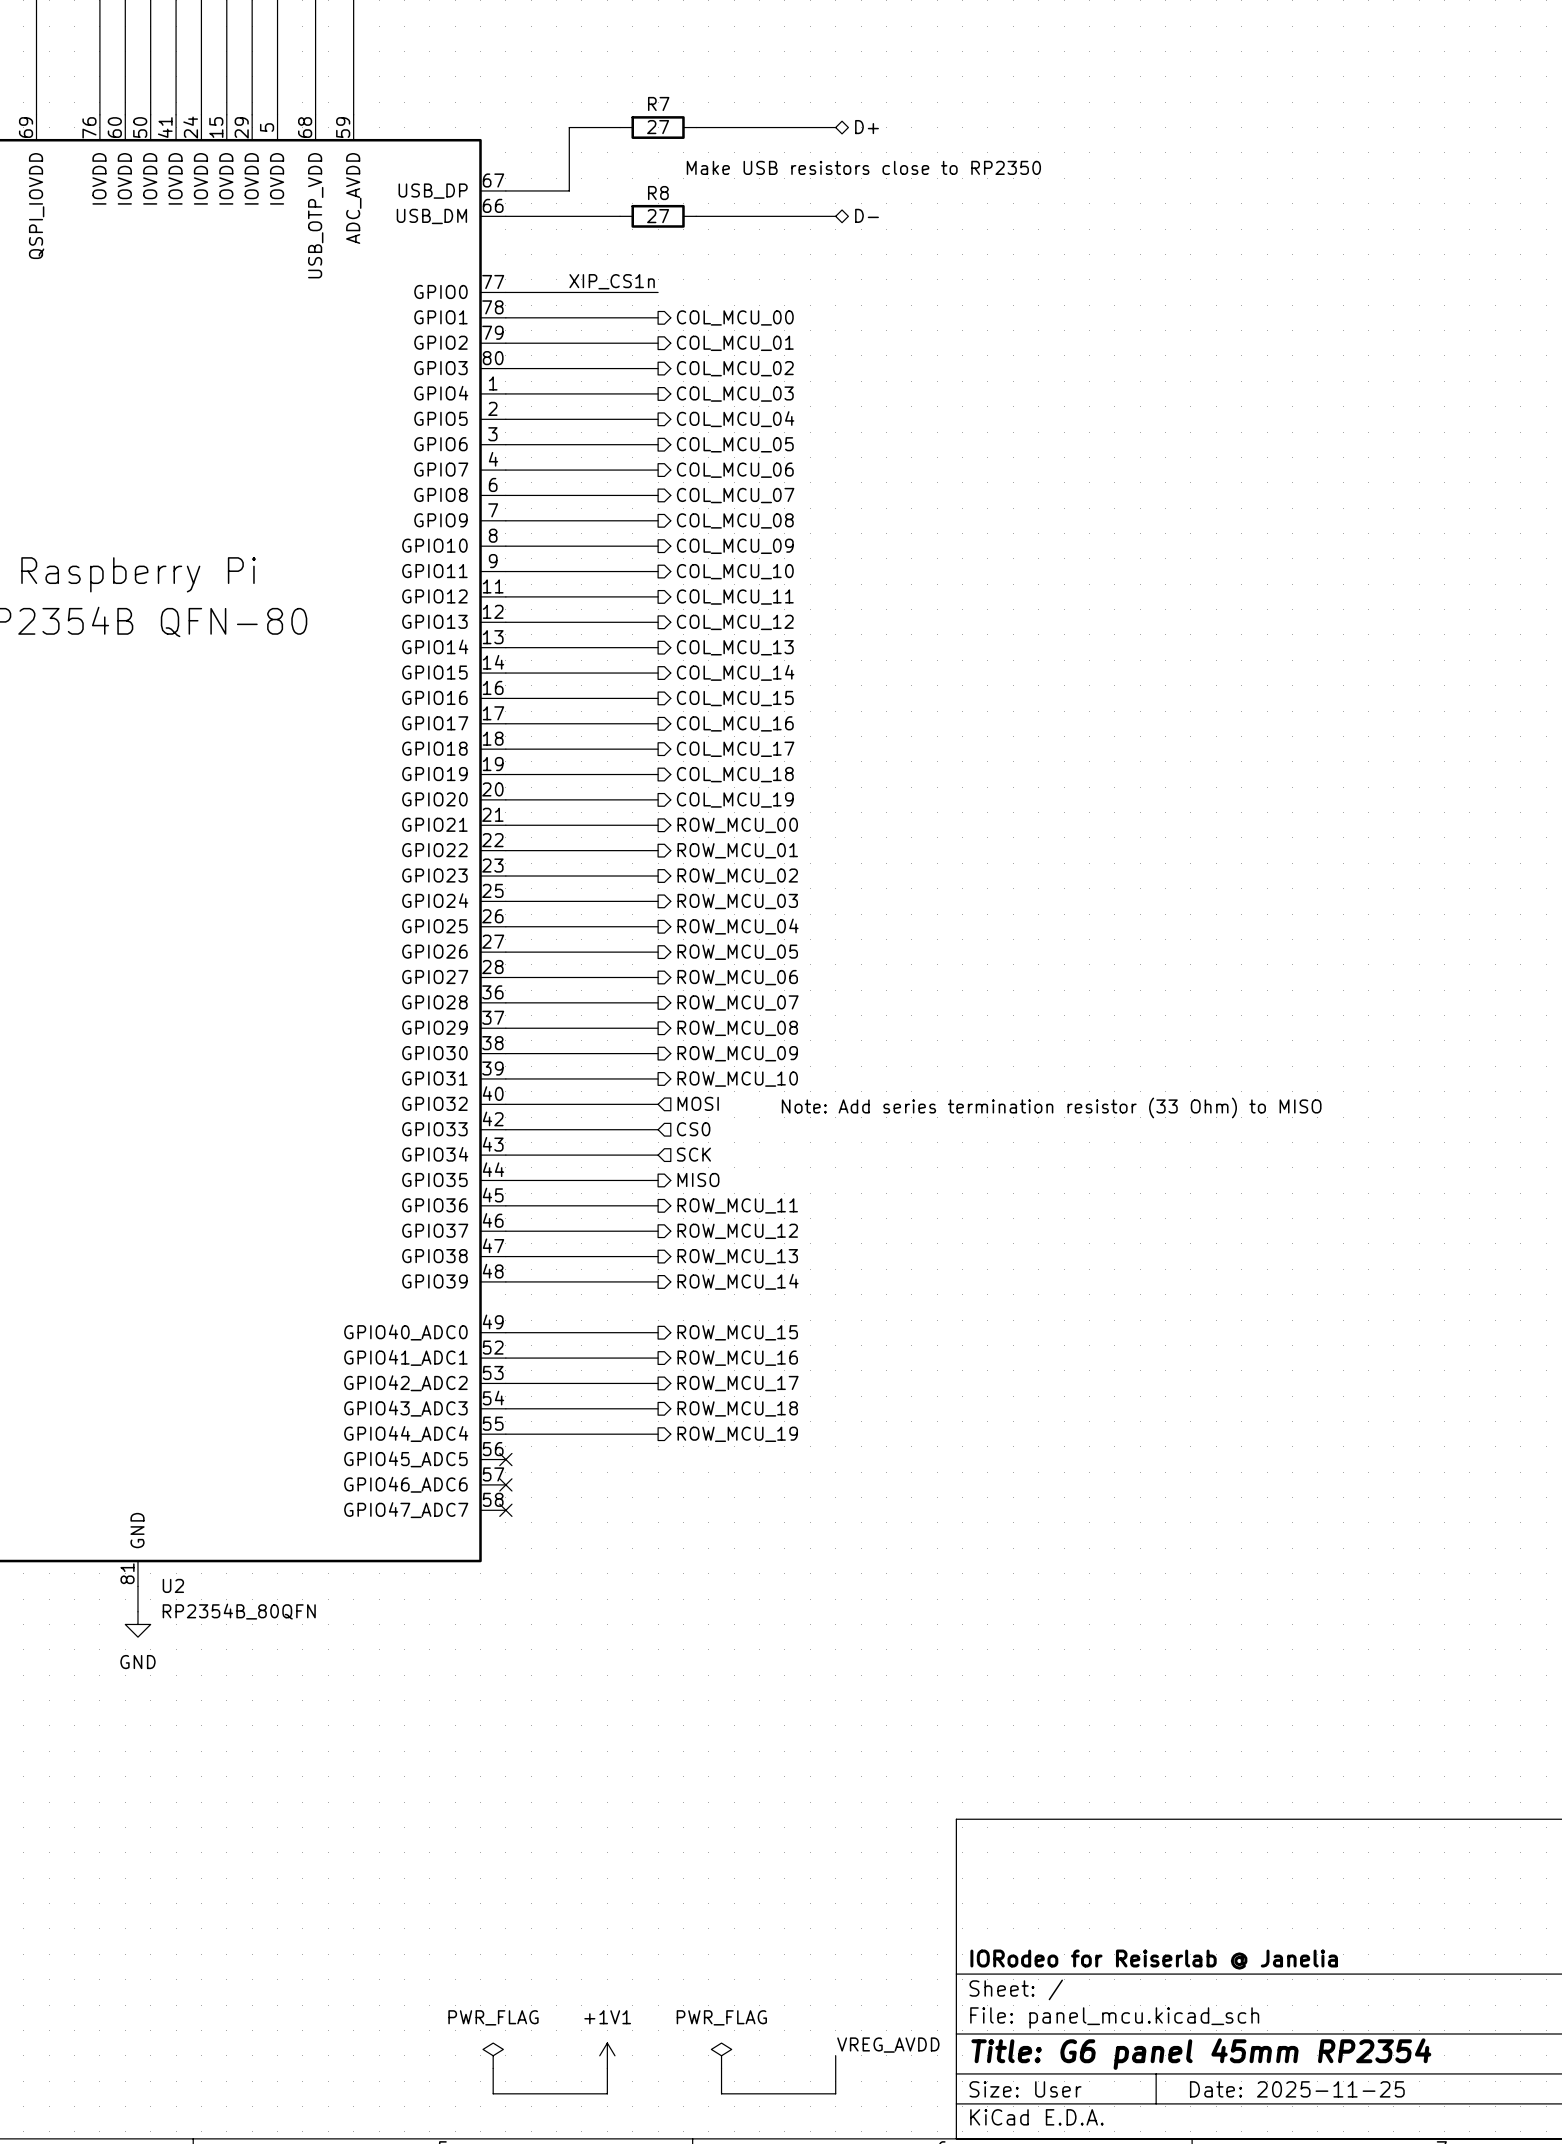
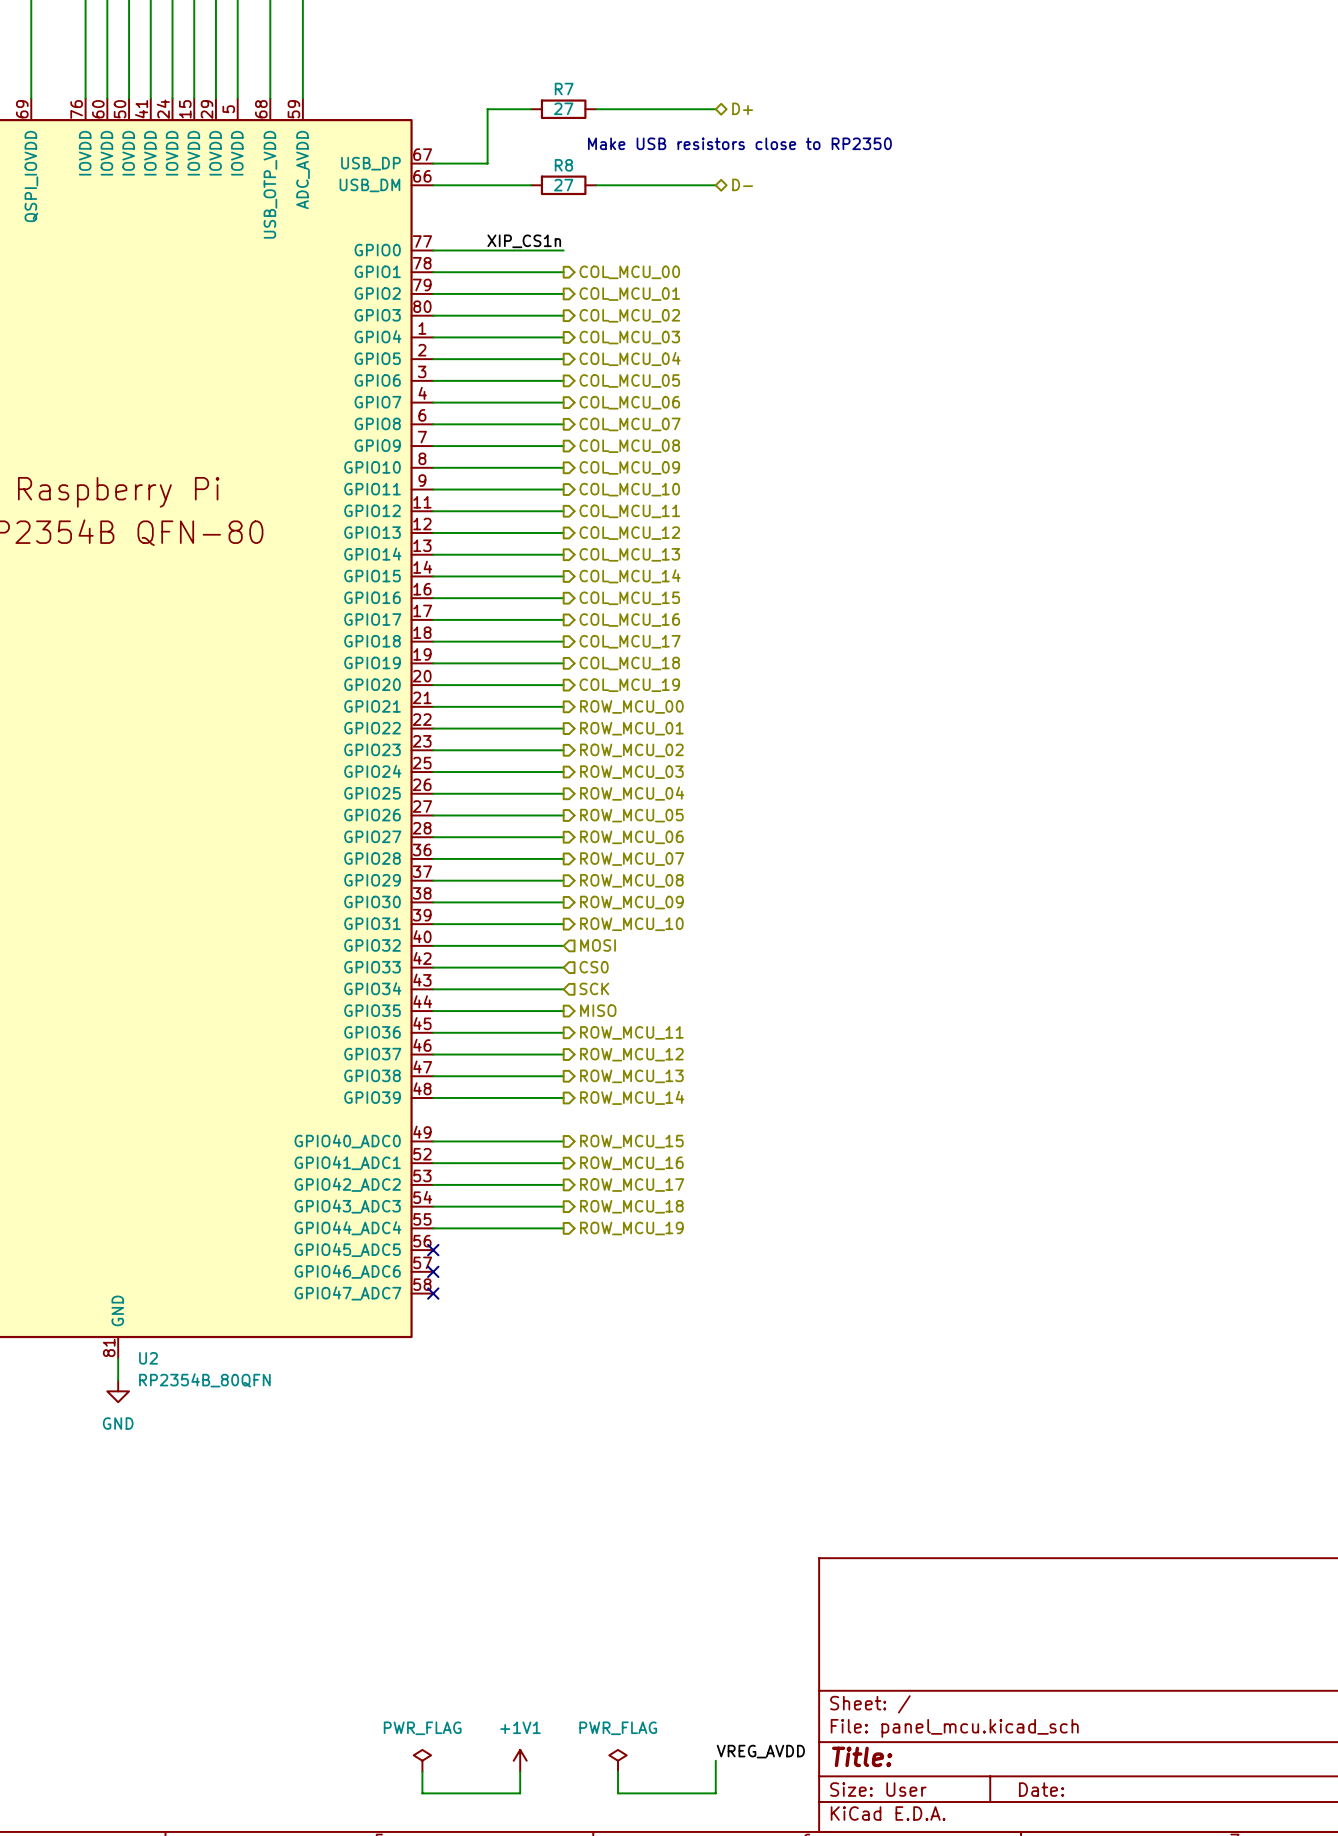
text: Note: Add series termination resistor (33 Ohm) to MISO (1051, 1107) -> none
title block: IORodeo for Reiserlab @ Janelia (1154, 1959) -> none
title block: Title: G6 panel 45mm RP2354 (1201, 2054) -> Title: (862, 1756)
title block: Date: 2025-11-25 (1297, 2089) -> Date: (1041, 1789)

